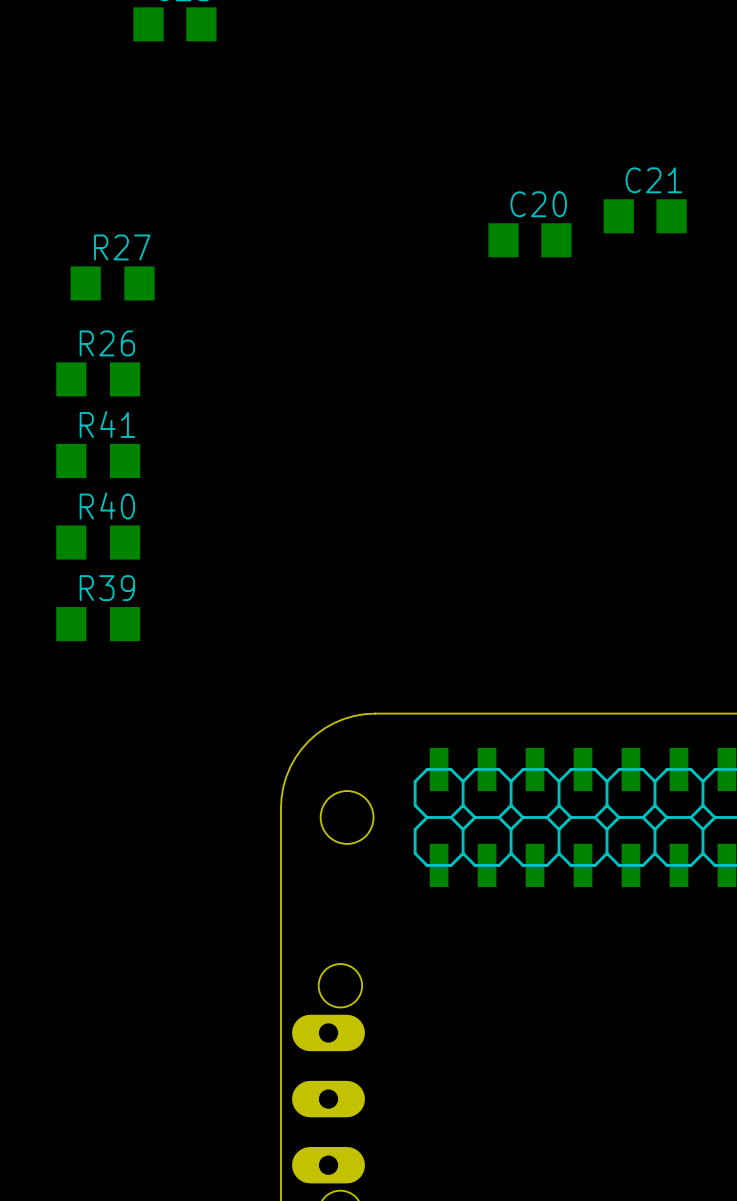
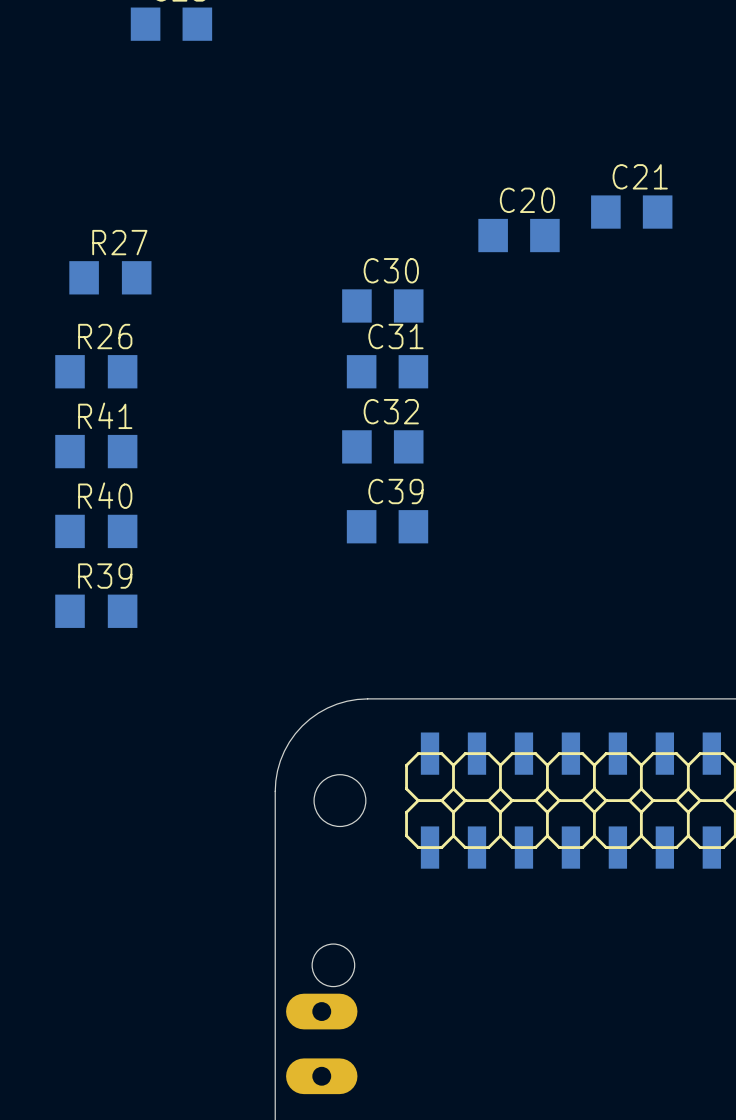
C30: none -> (382, 305)
C31: none -> (387, 371)
C32: none -> (382, 446)
C39: none -> (387, 526)

